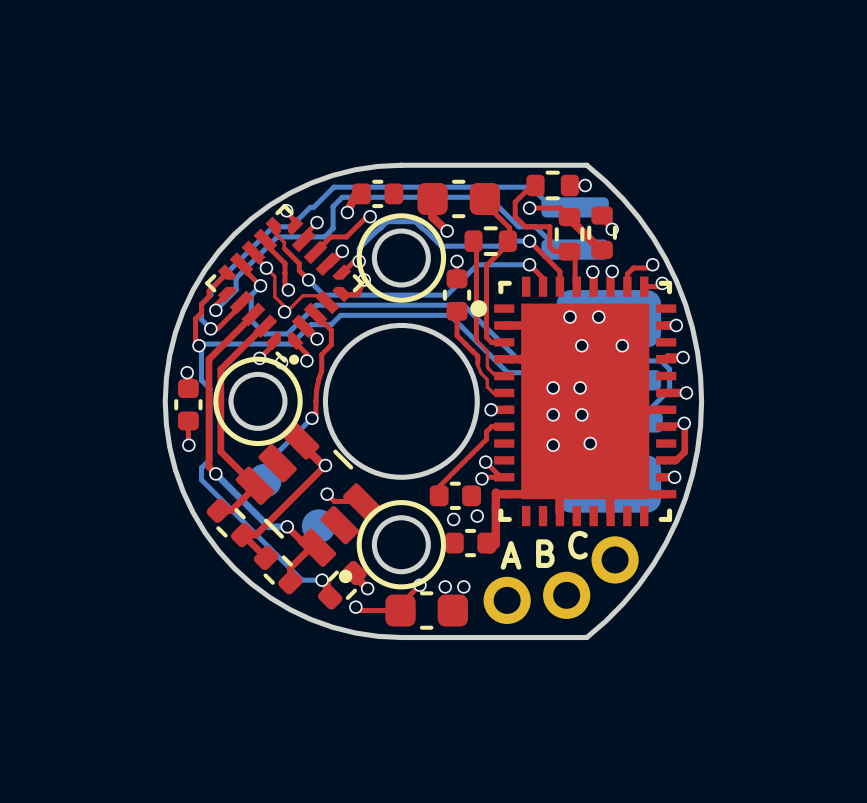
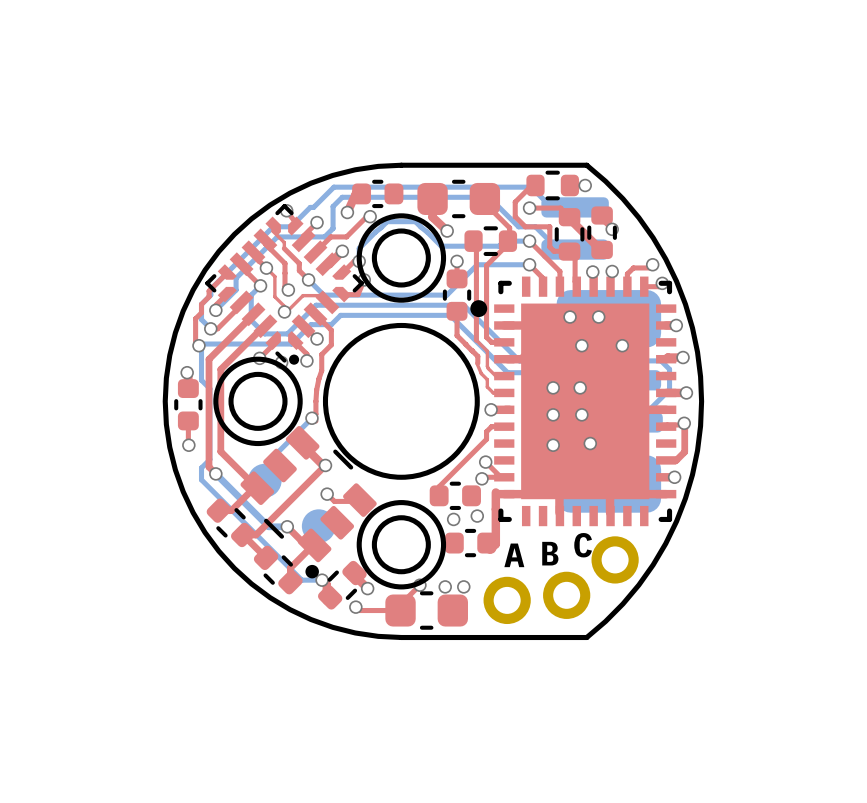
part footprint: [235, 421, 382, 584] -> [240, 426, 377, 579]

